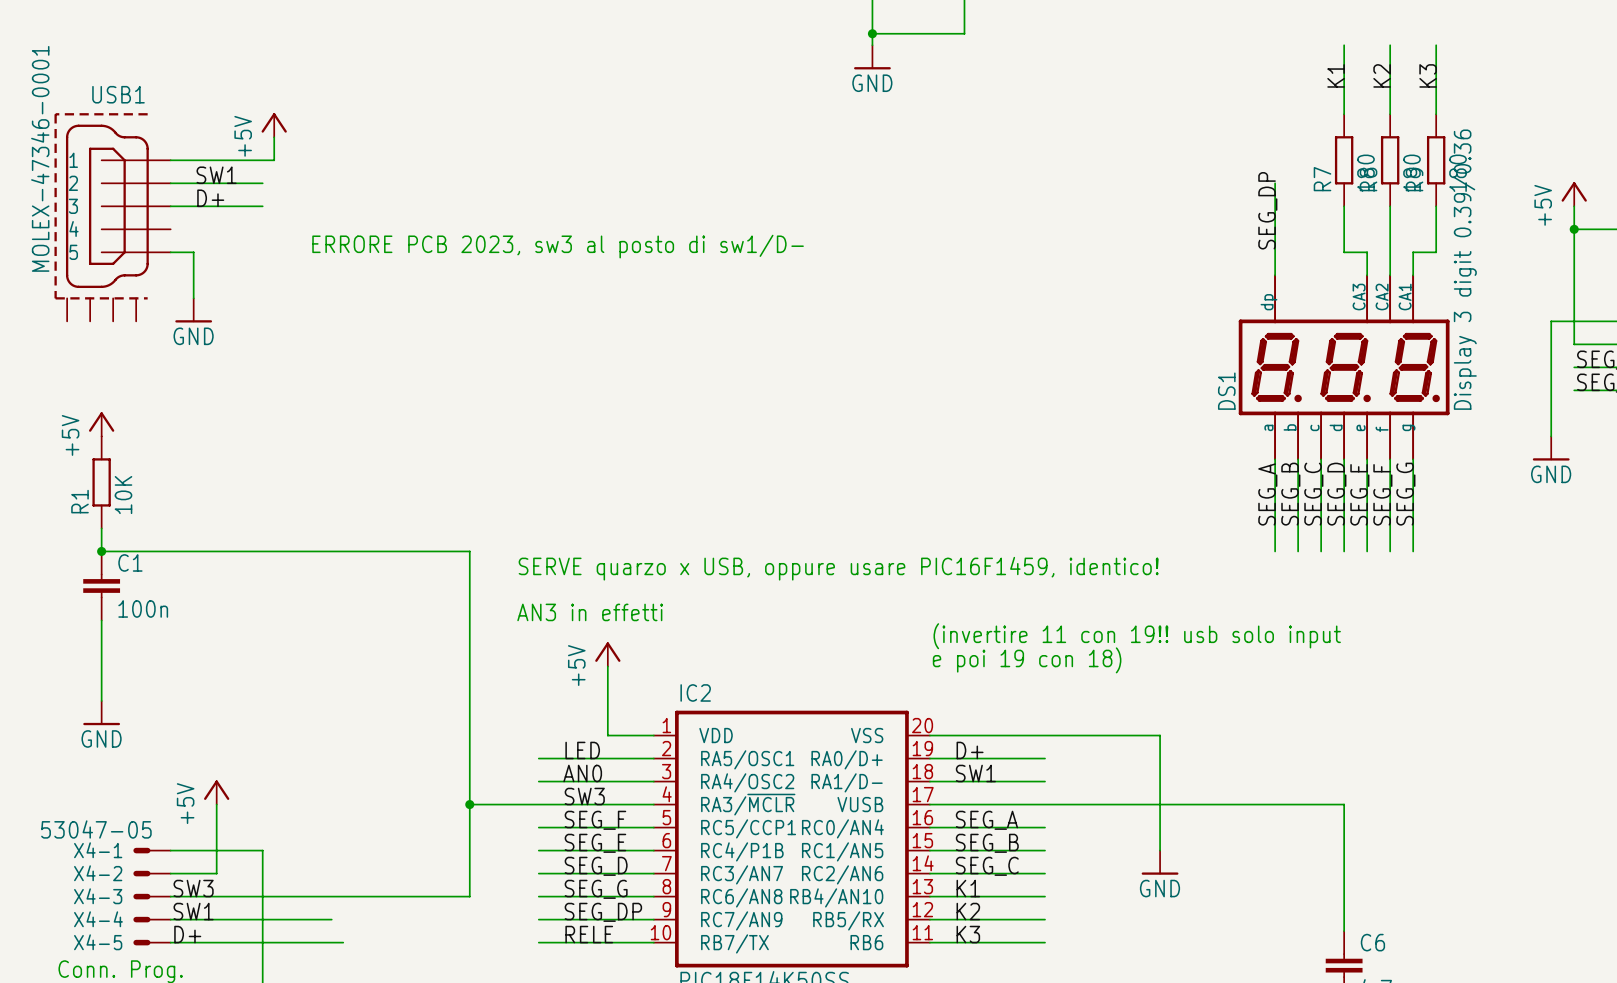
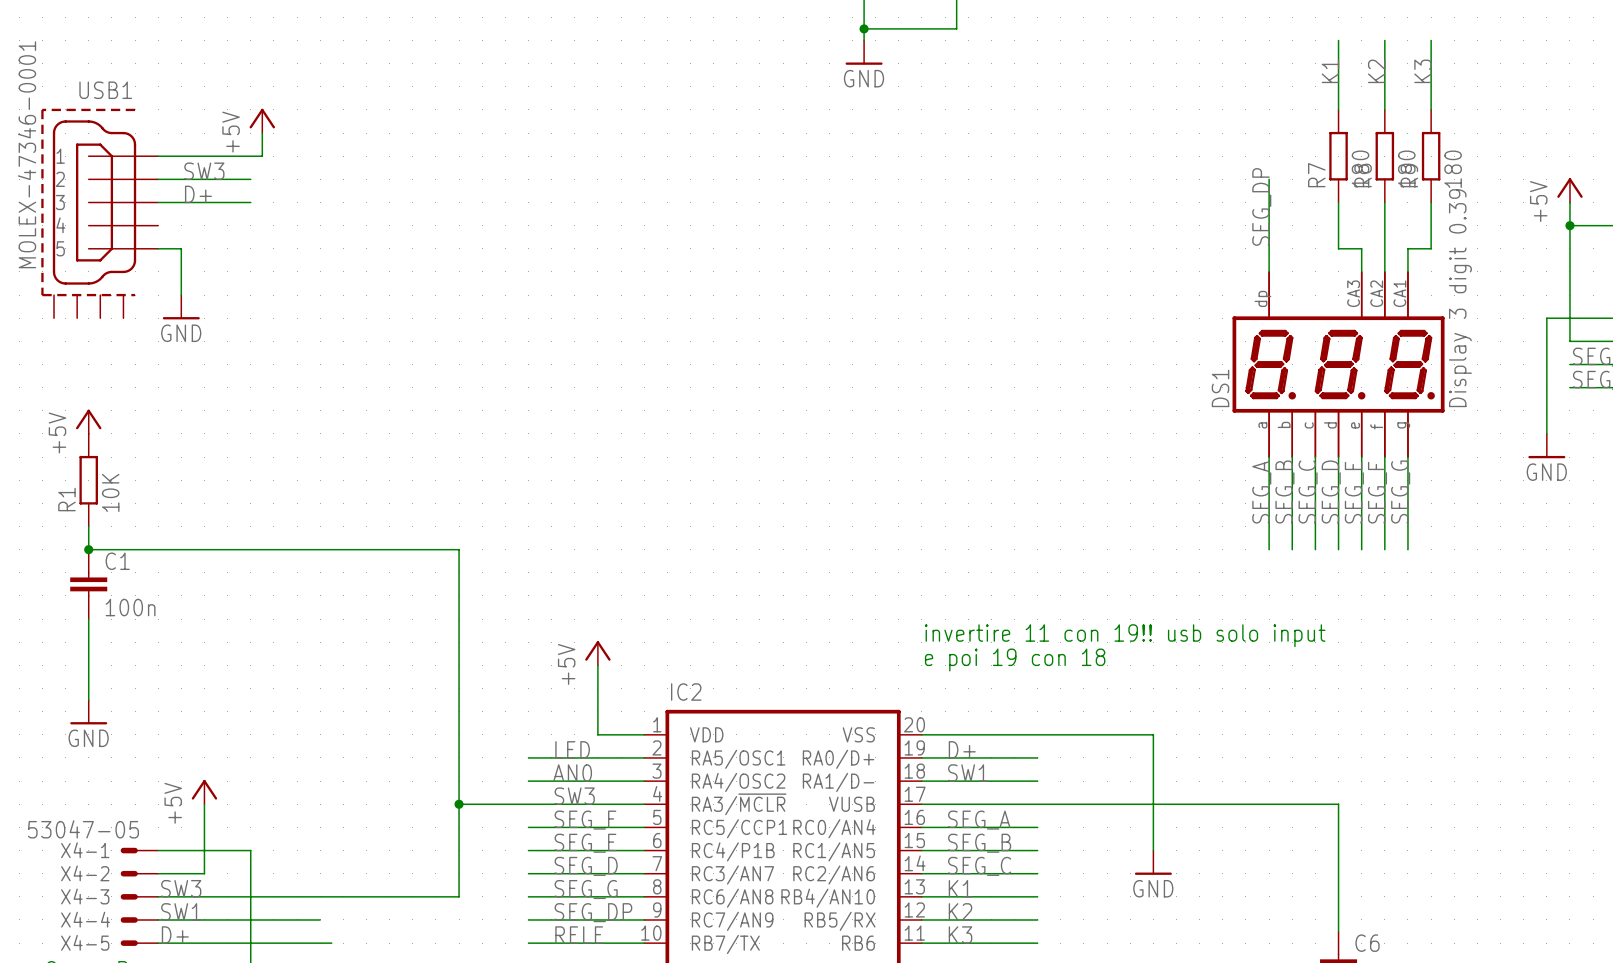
label: SW1 (216, 175) -> SW3 (204, 171)
text: ERRORE PCB 2023, sw3 al posto di sw1/D- (558, 246) -> none
DS1 value: Display 3 digit 0.39/0.36 (1464, 269) -> Display 3 digit 0.39 (1460, 298)
text: SERVE quarzo x USB, oppure usare PIC16F1459, identico! (838, 568) -> none
text: AN3 in effetti (590, 612) -> none
text: (invertire 11 con 19!! usb solo input (1137, 636) -> invertire 11 con 19!! usb solo input (1125, 635)
text: e poi 19 con 18) (1027, 660) -> e poi 19 con 18 (1015, 660)

